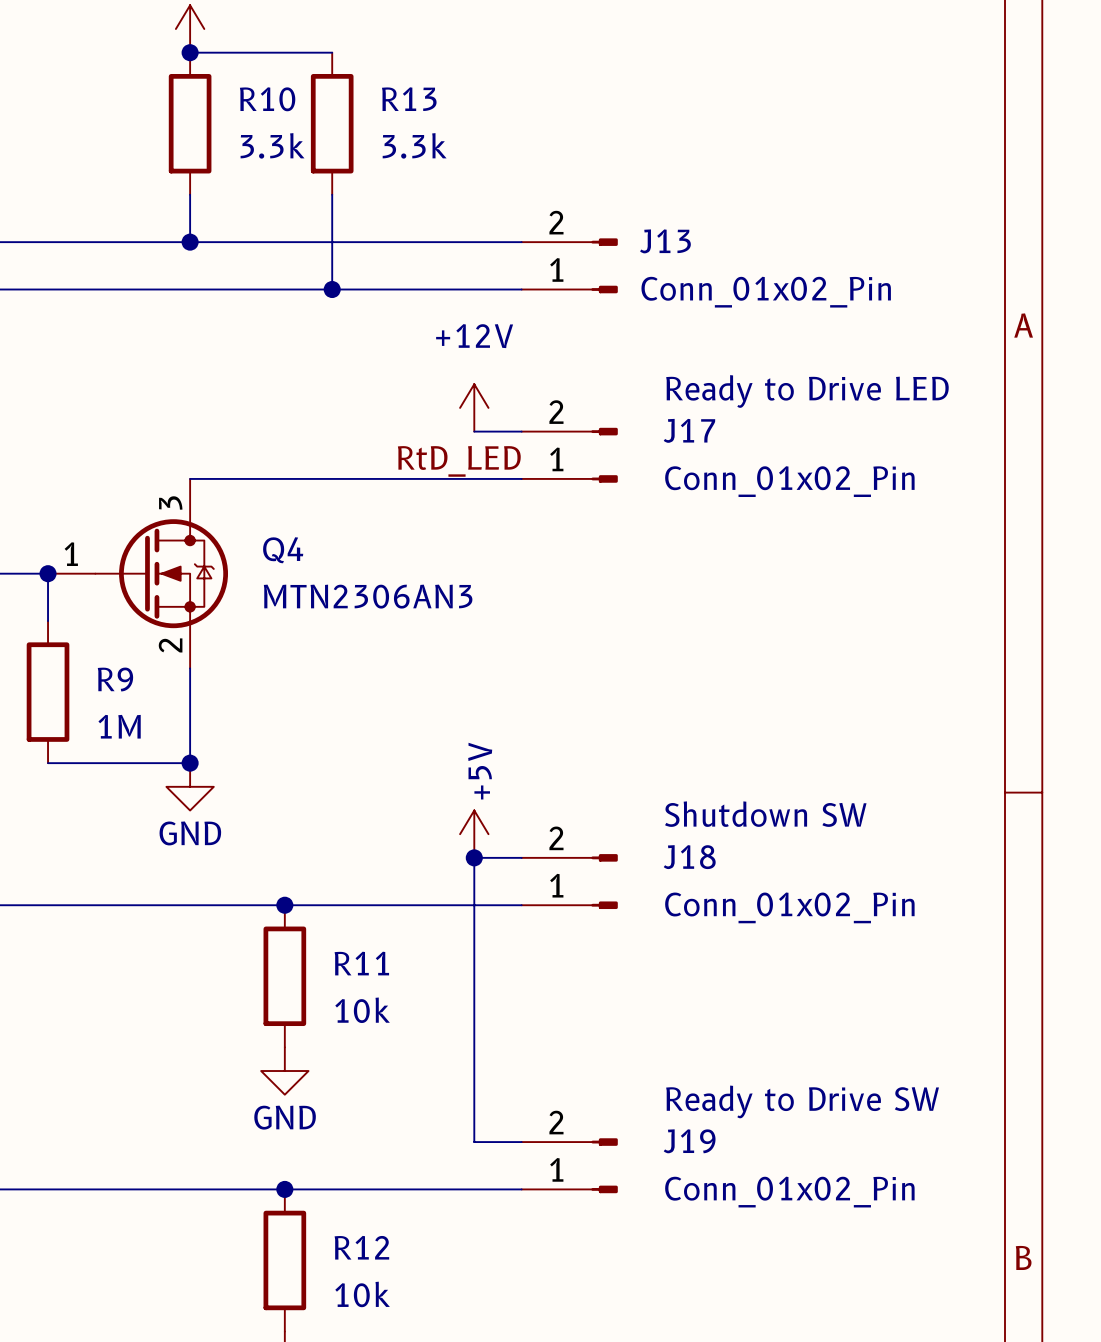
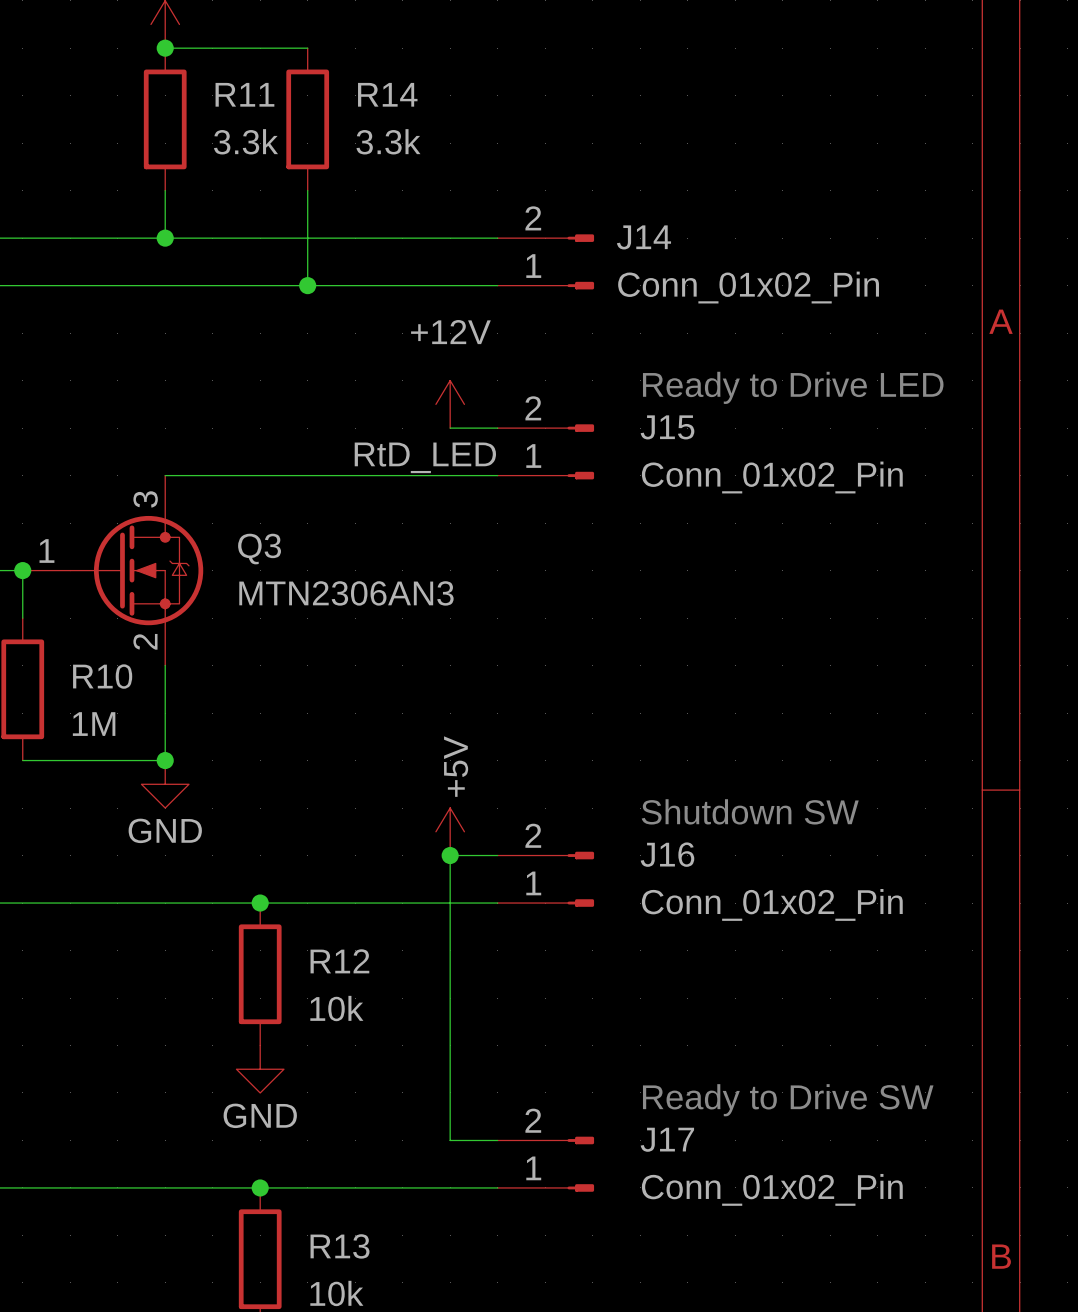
R10 name: R10 (267, 99) -> R11 (244, 94)
R13 name: R13 (409, 99) -> R14 (387, 94)
J13 name: J13 (665, 241) -> J14 (643, 237)
J17 name: J17 (689, 430) -> J15 (667, 427)
Q4 name: Q4 (283, 550) -> Q3 (259, 549)
R9 name: R9 (115, 679) -> R10 (102, 676)
J18 name: J18 (689, 857) -> J16 (667, 854)
R11 name: R11 (361, 963) -> R12 (339, 961)
J19 name: J19 (689, 1141) -> J17 (667, 1139)
R12 name: R12 (361, 1247) -> R13 (340, 1246)

